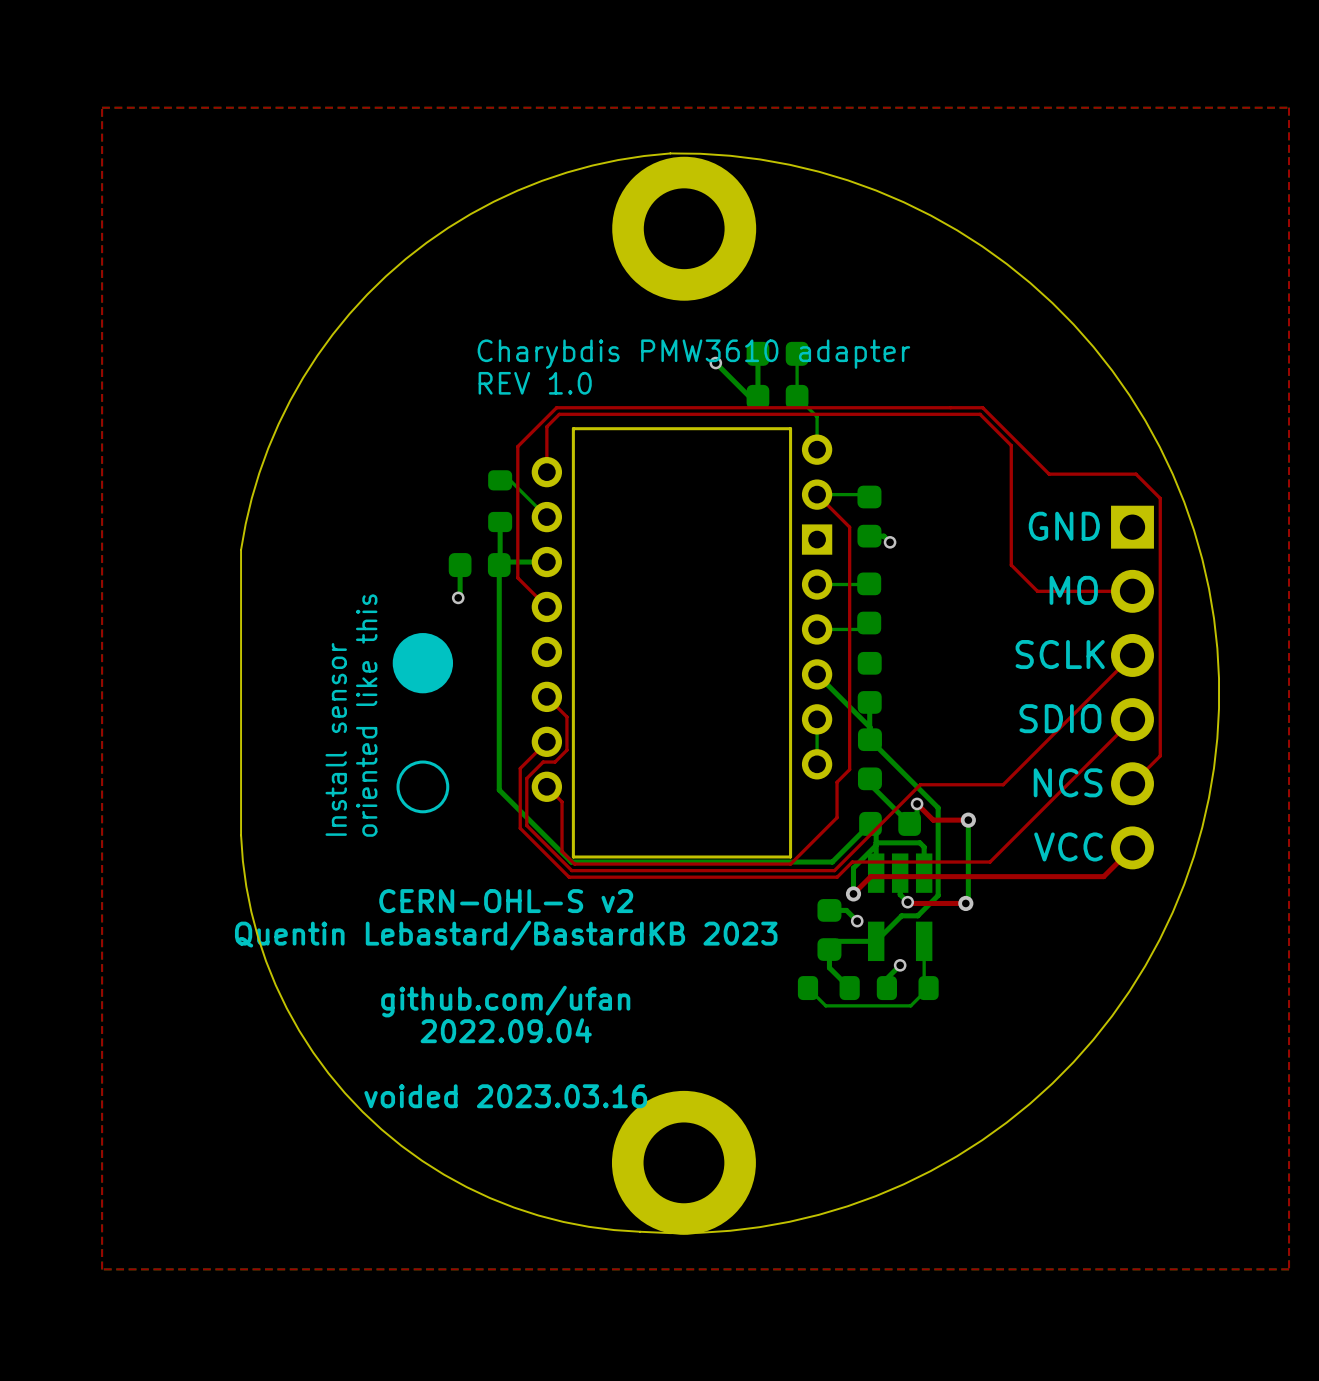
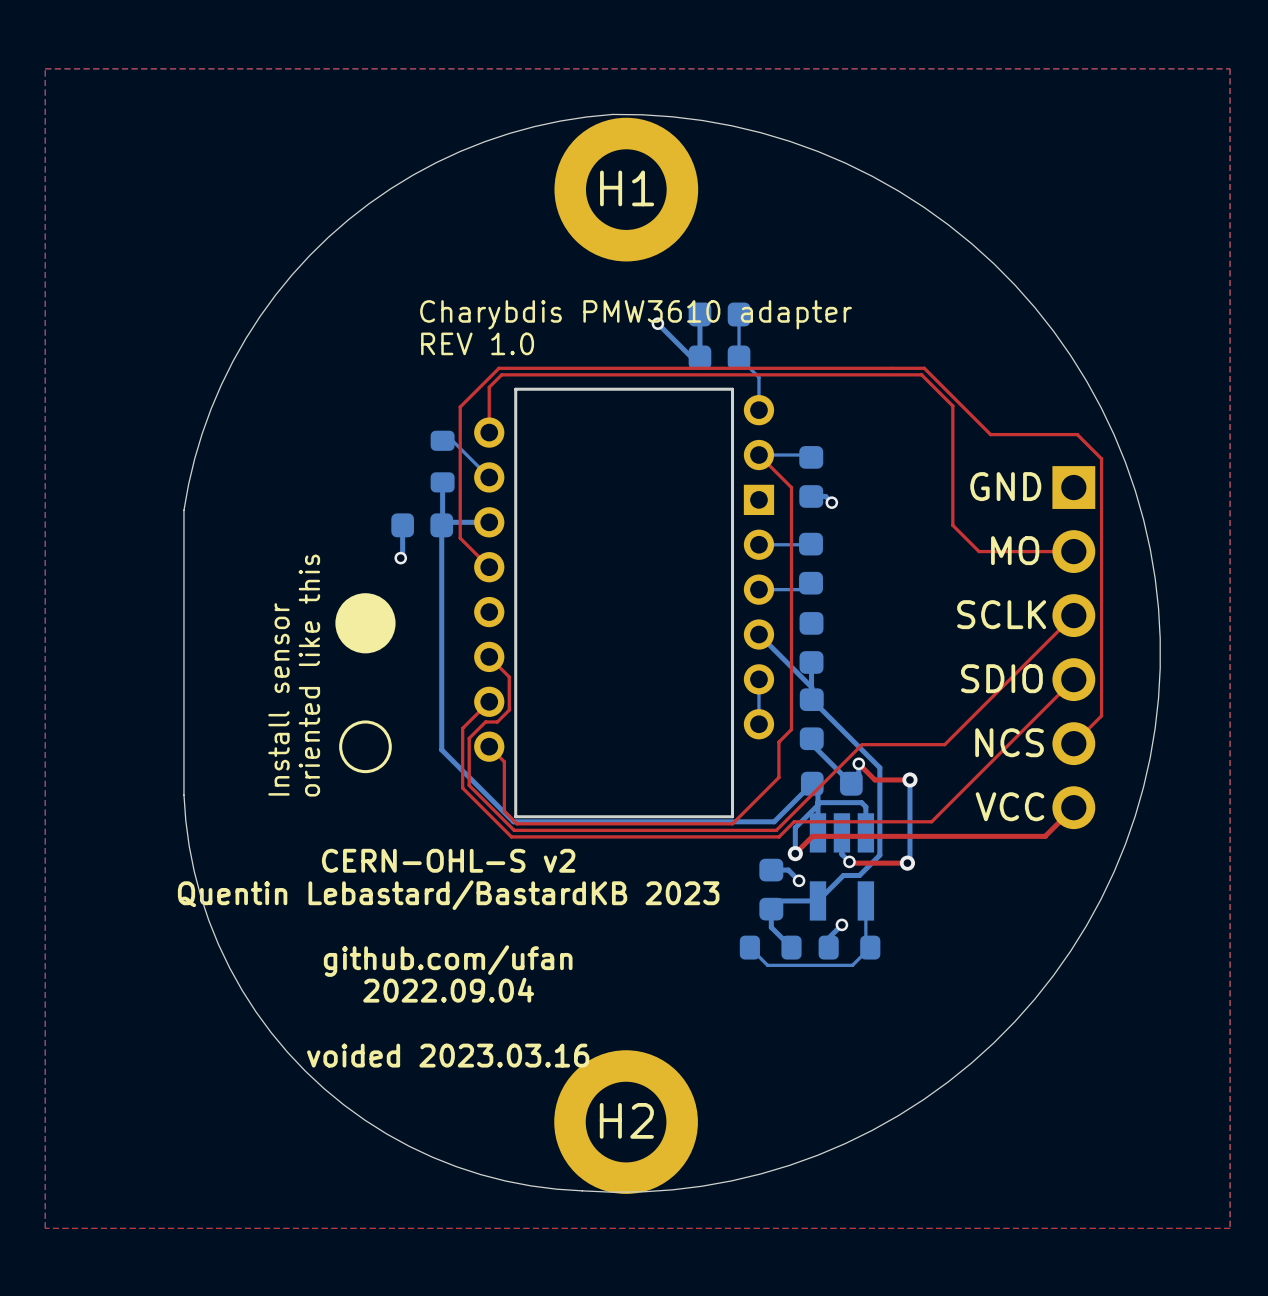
H1 name: none -> H1 (627, 188)
H2 name: none -> H2 (626, 1120)

